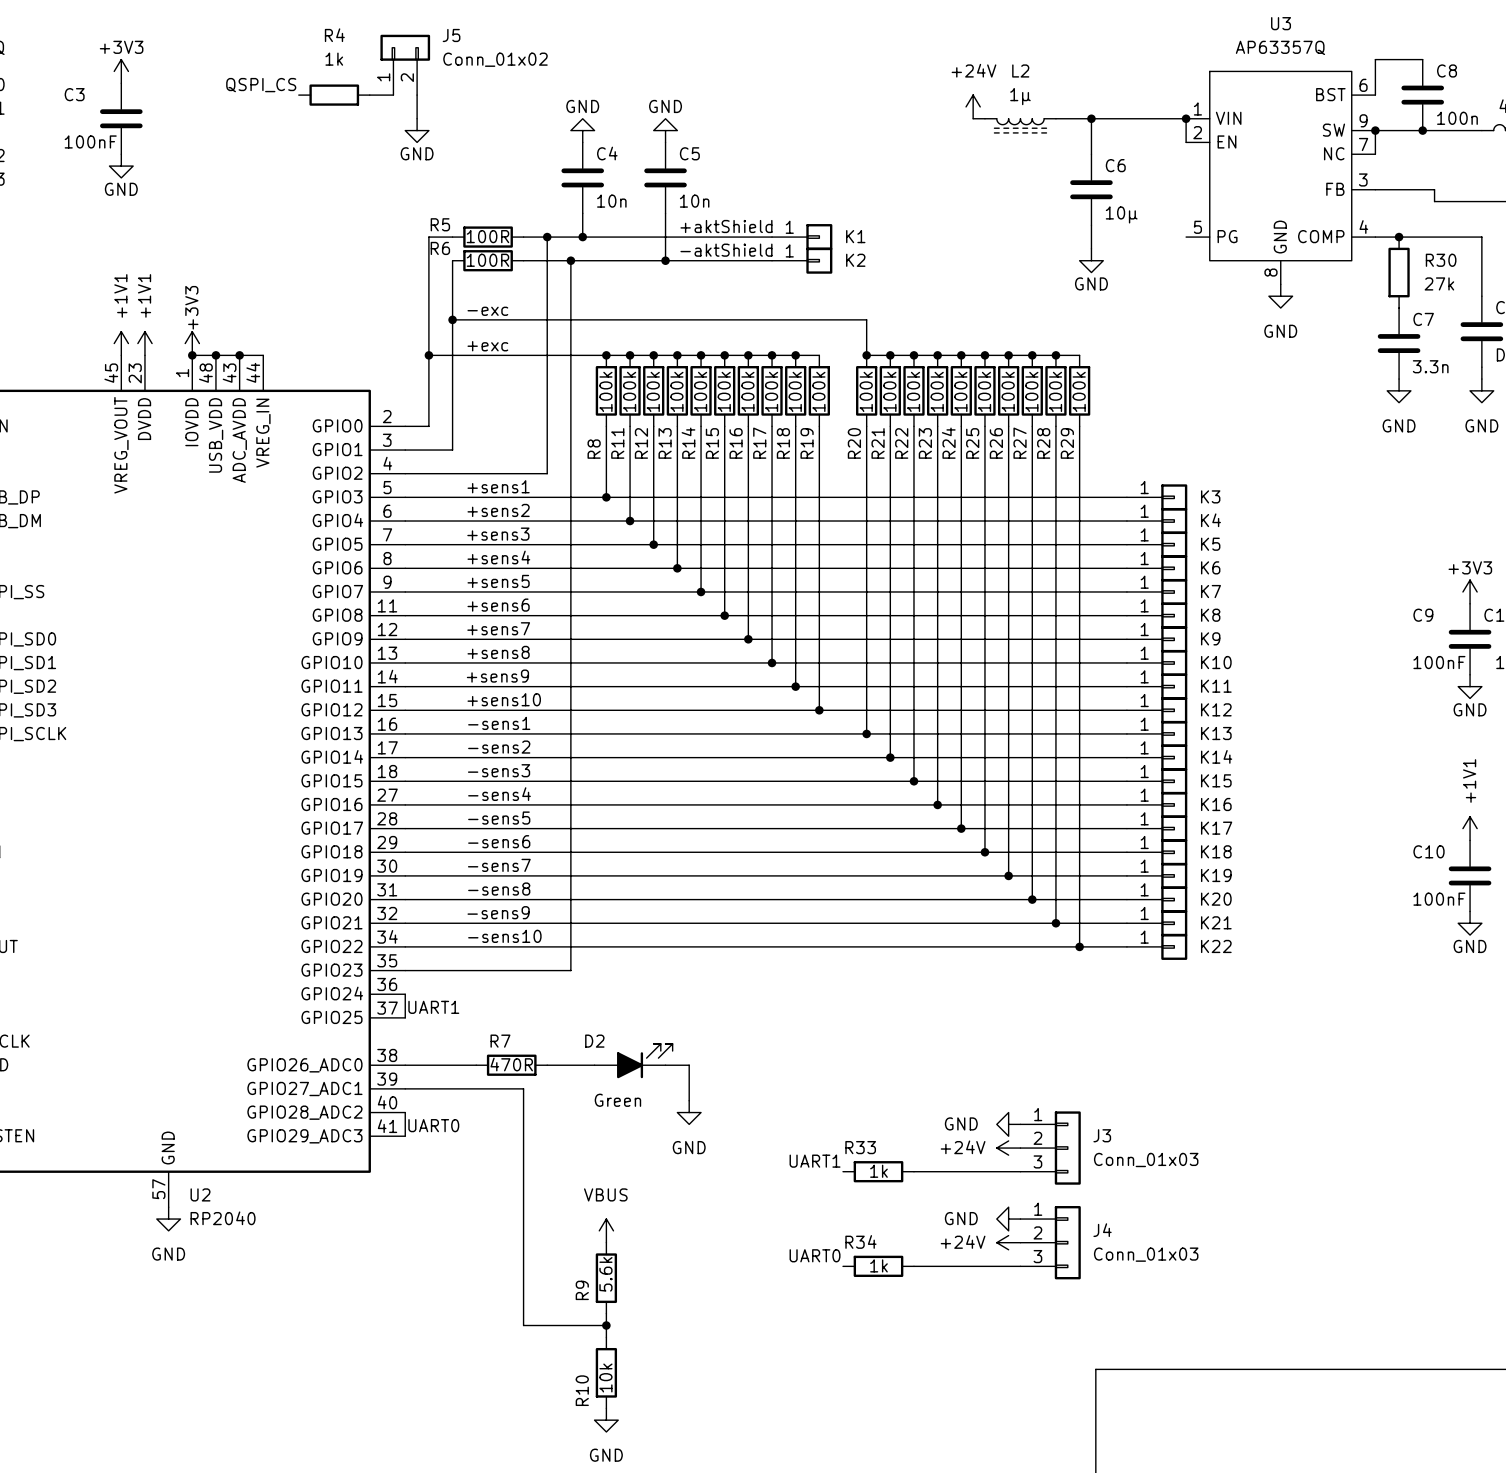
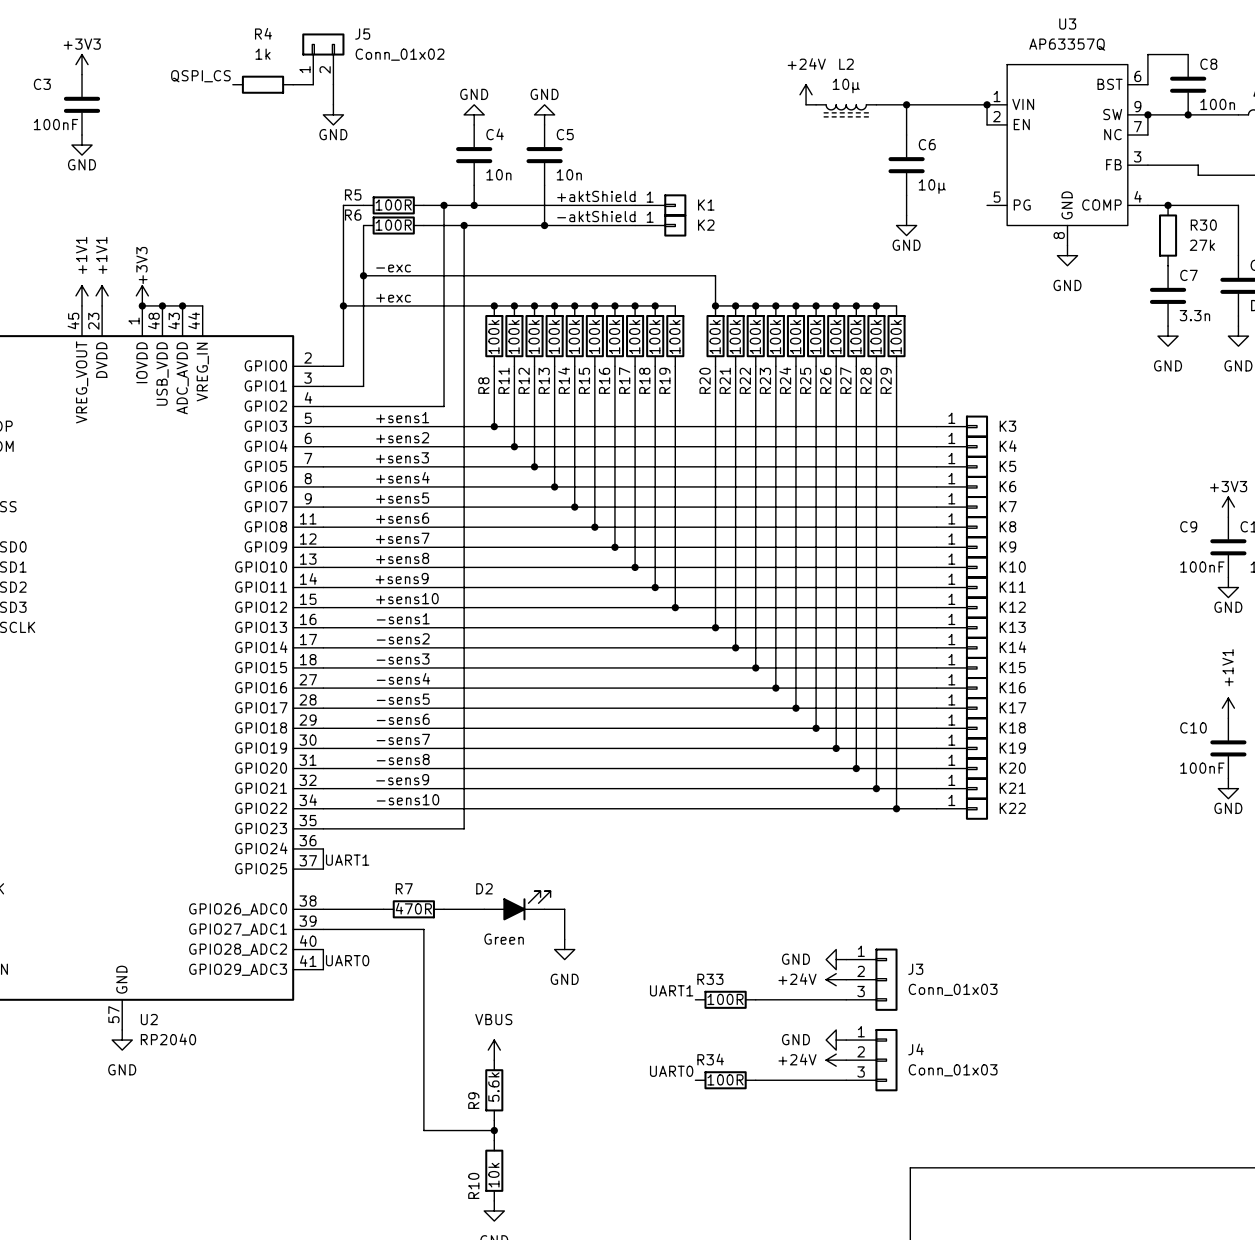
L2 value: 1µ (1020, 96) -> 10µ (846, 86)
R33 value: 1k (878, 1171) -> 100R (725, 999)
R34 value: 1k (878, 1265) -> 100R (725, 1079)

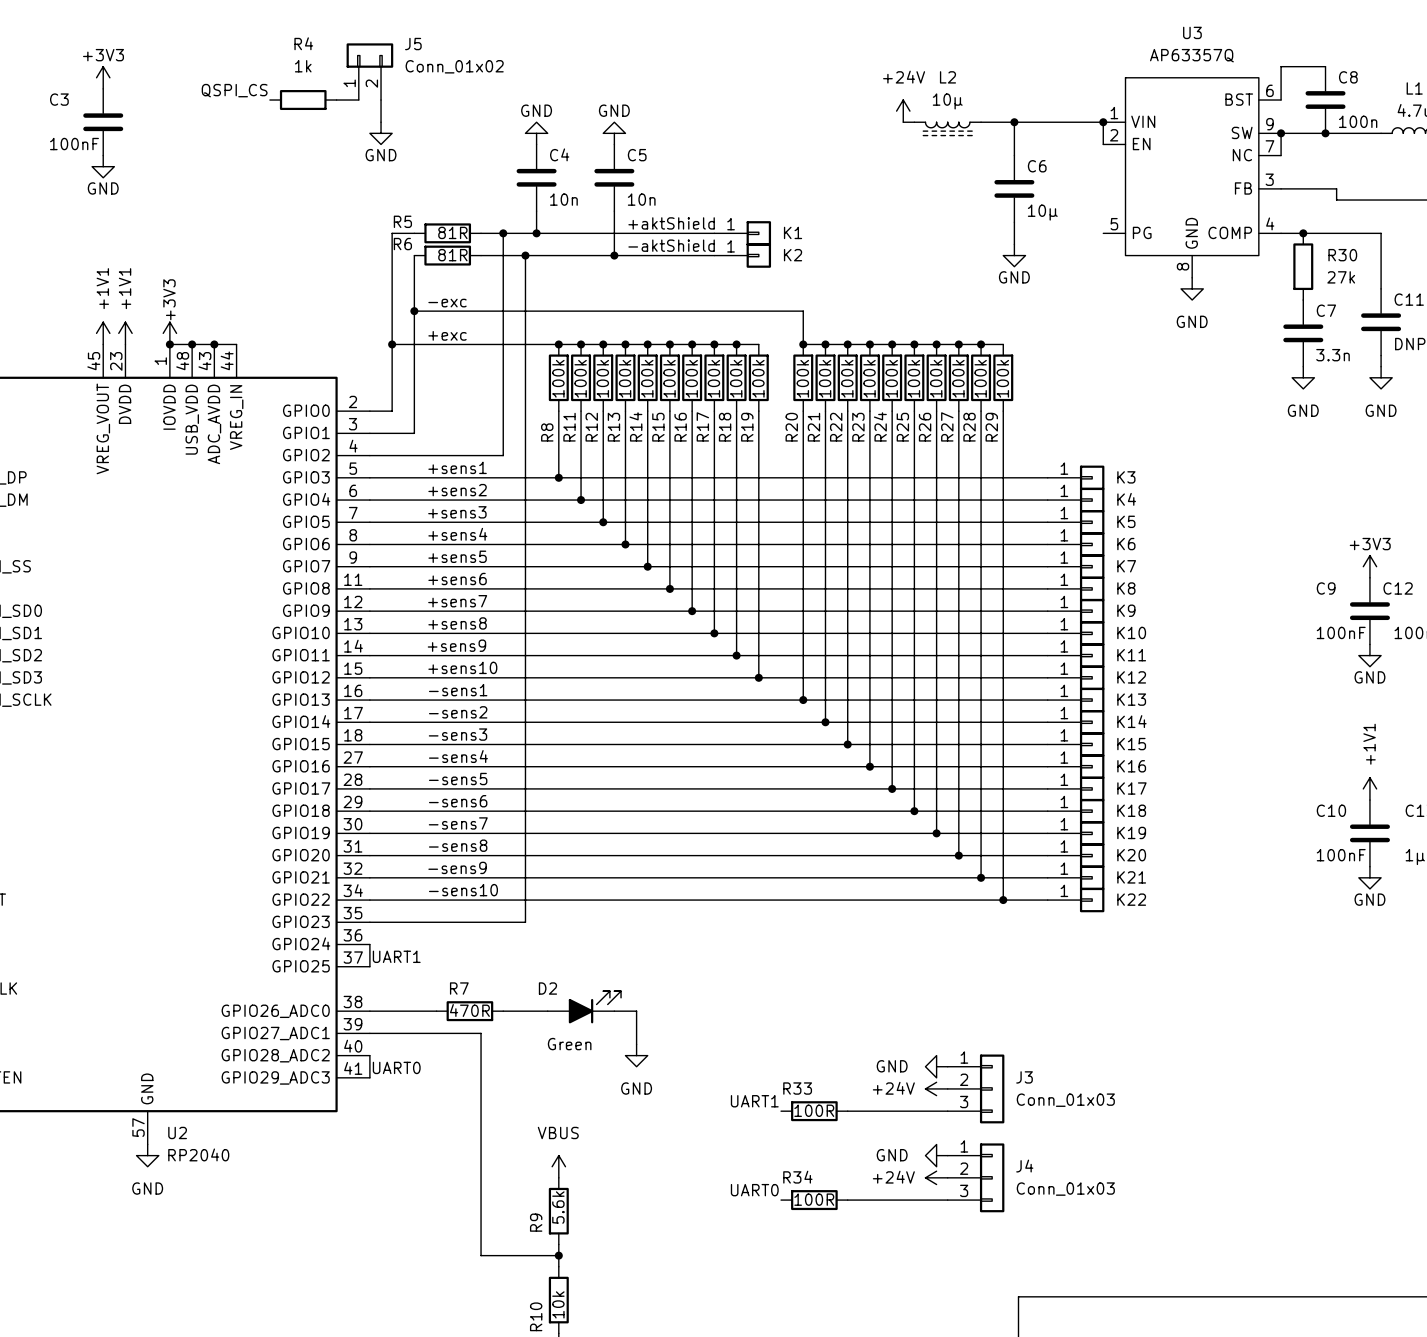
R5 value: 100R (393, 205) -> 81R (452, 232)
R6 value: 100R (393, 225) -> 81R (452, 255)

